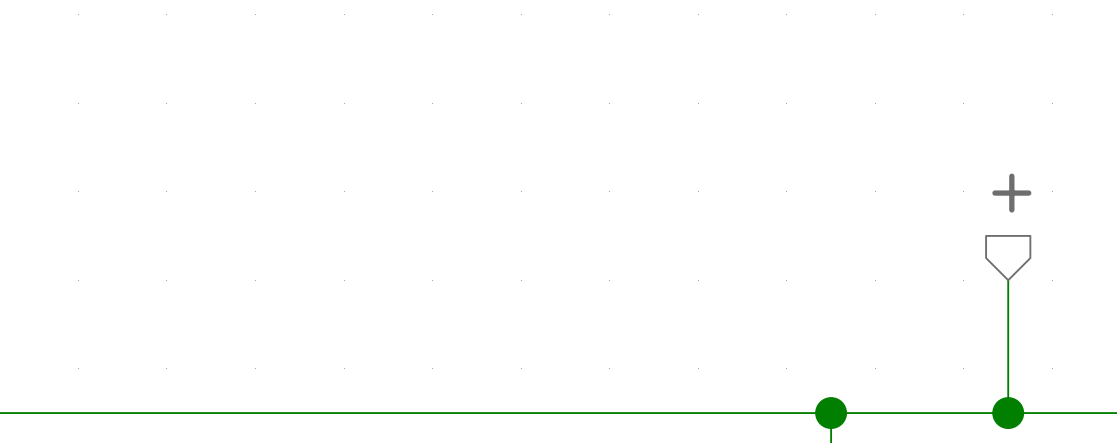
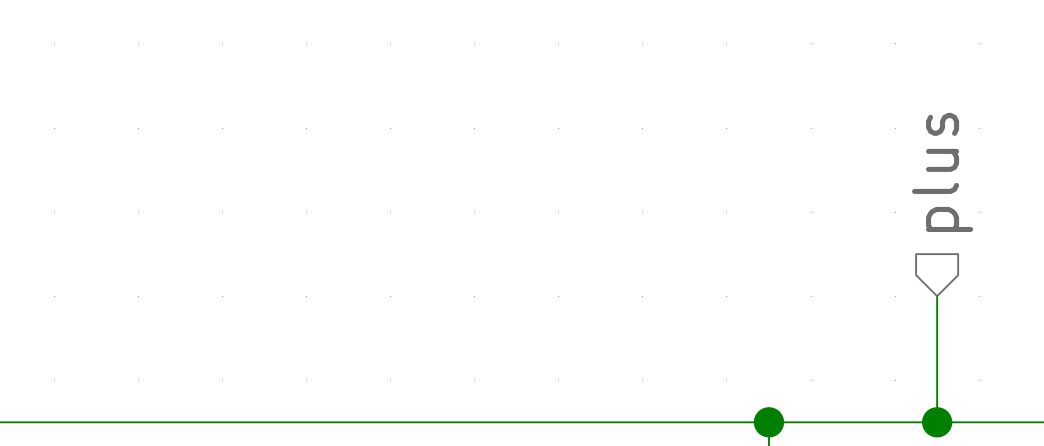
hierarchical label: + (1011, 193) -> plus (942, 172)

